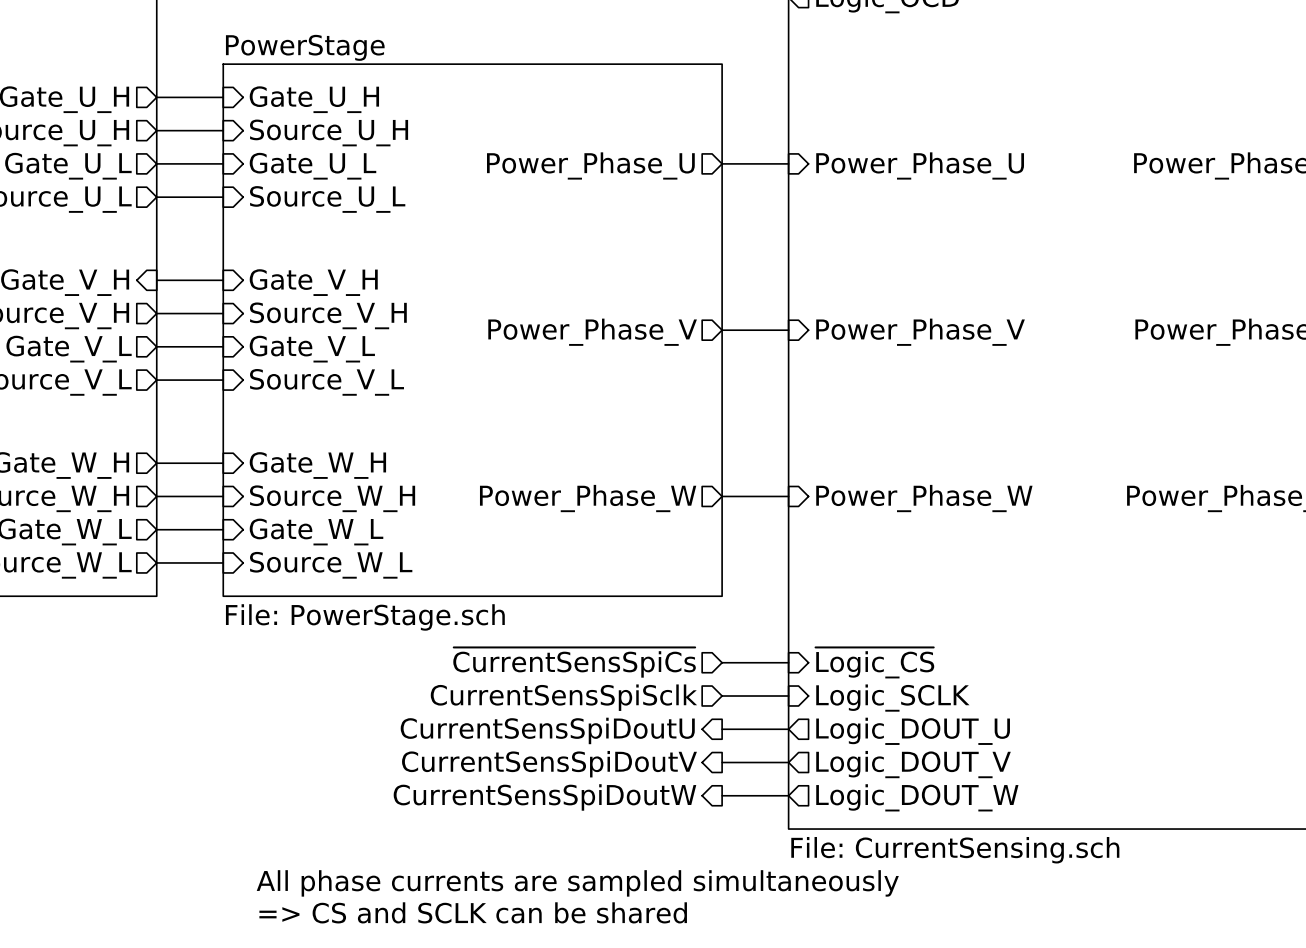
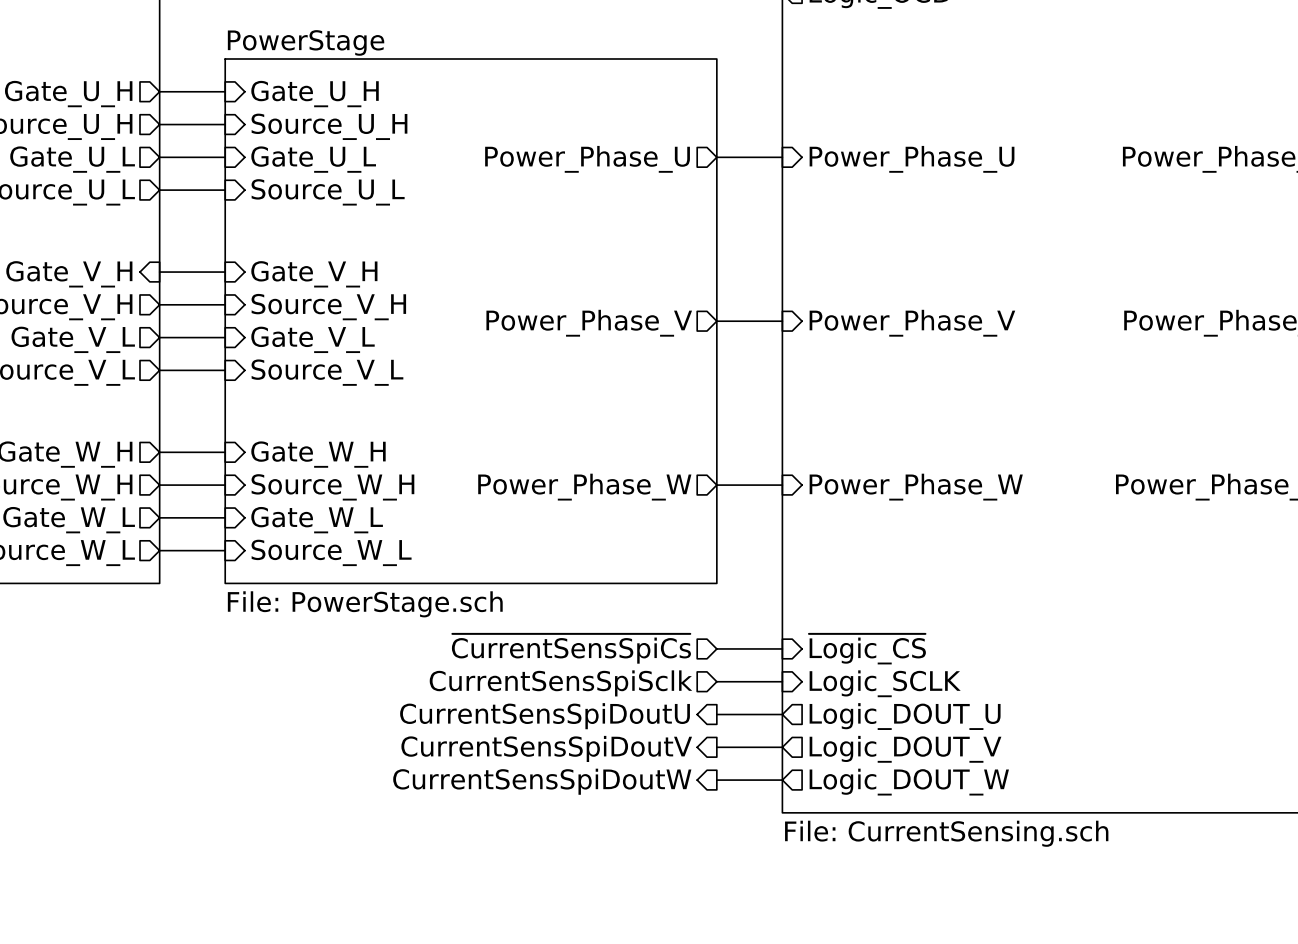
text: All phase currents are sampled simultaneously (577, 883) -> none
text: => CS and SCLK can be shared (473, 912) -> none

